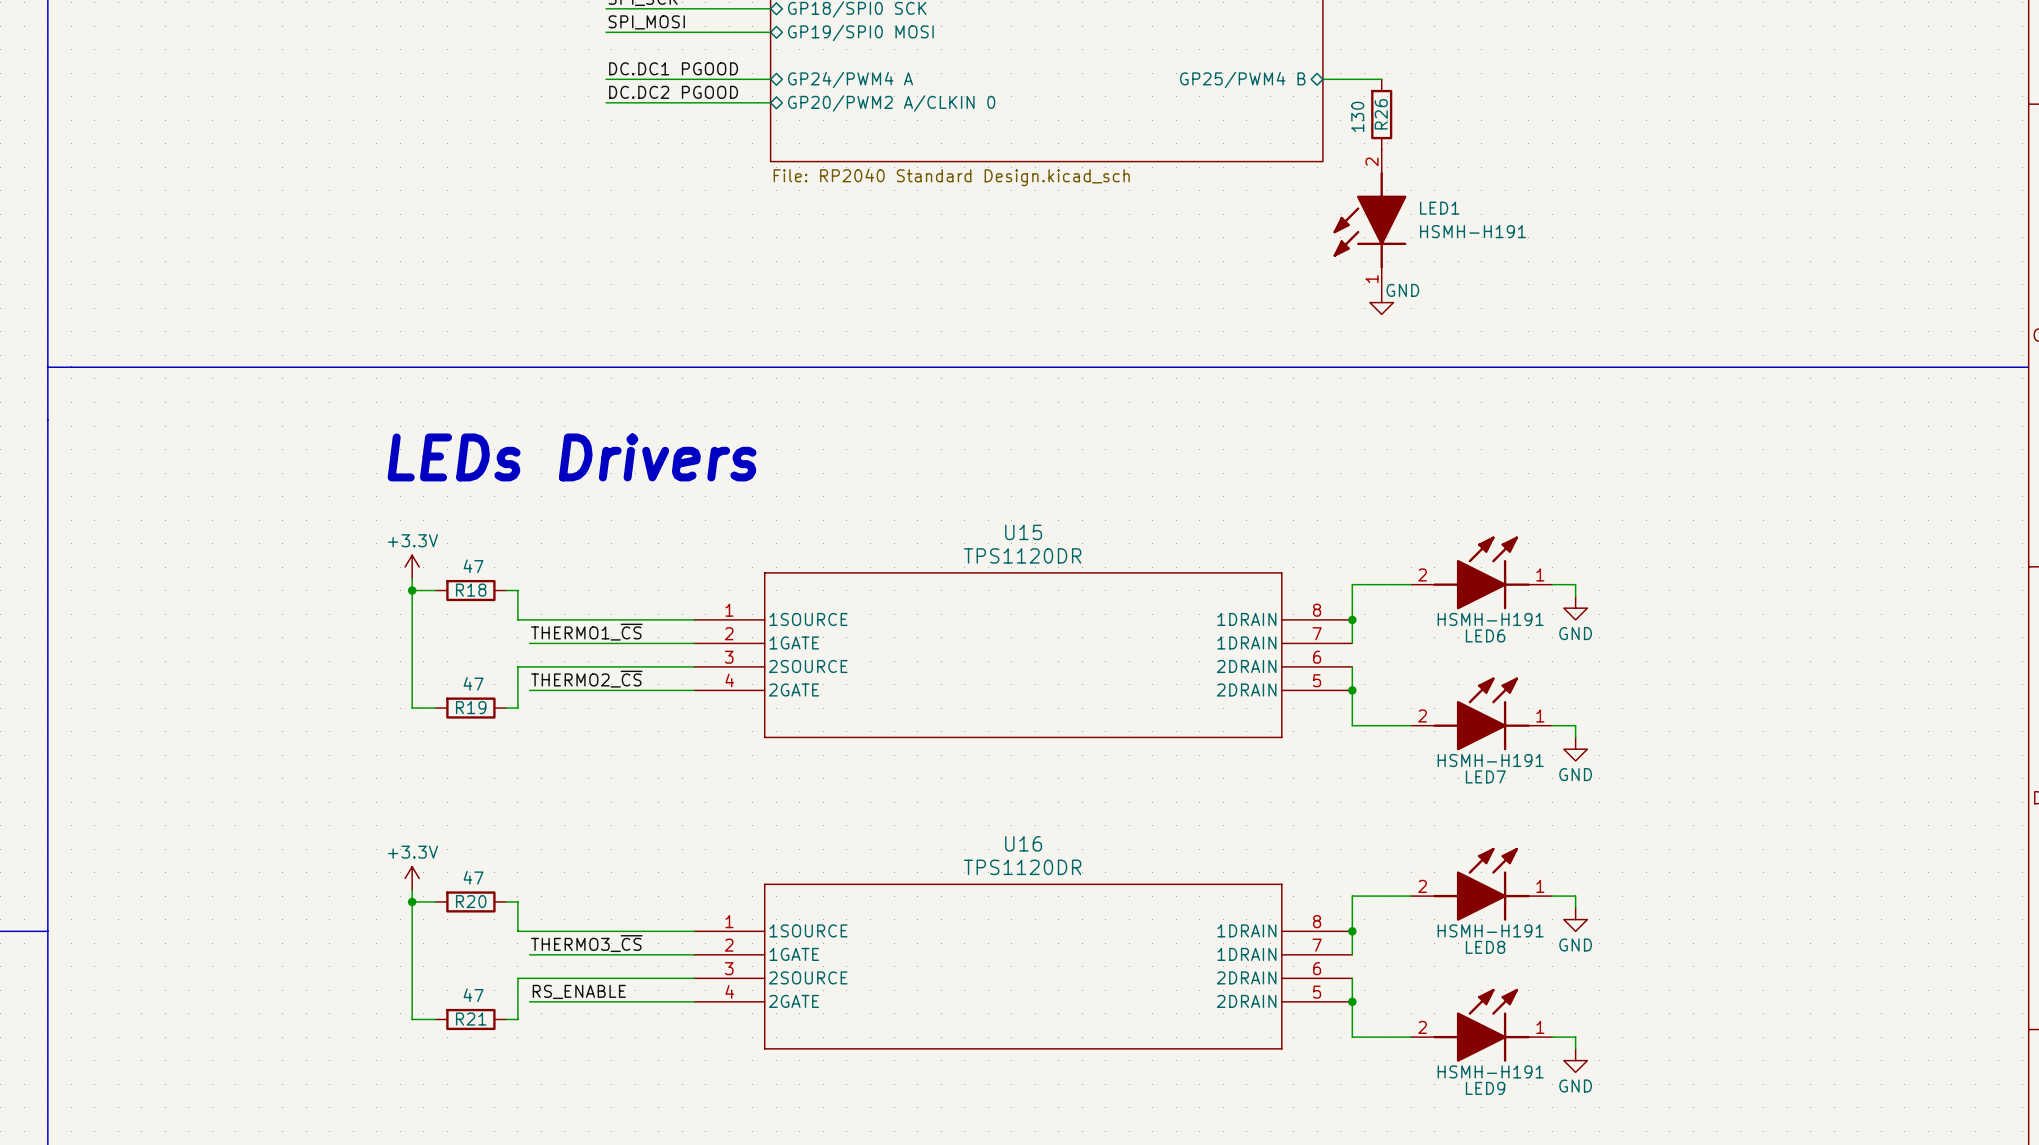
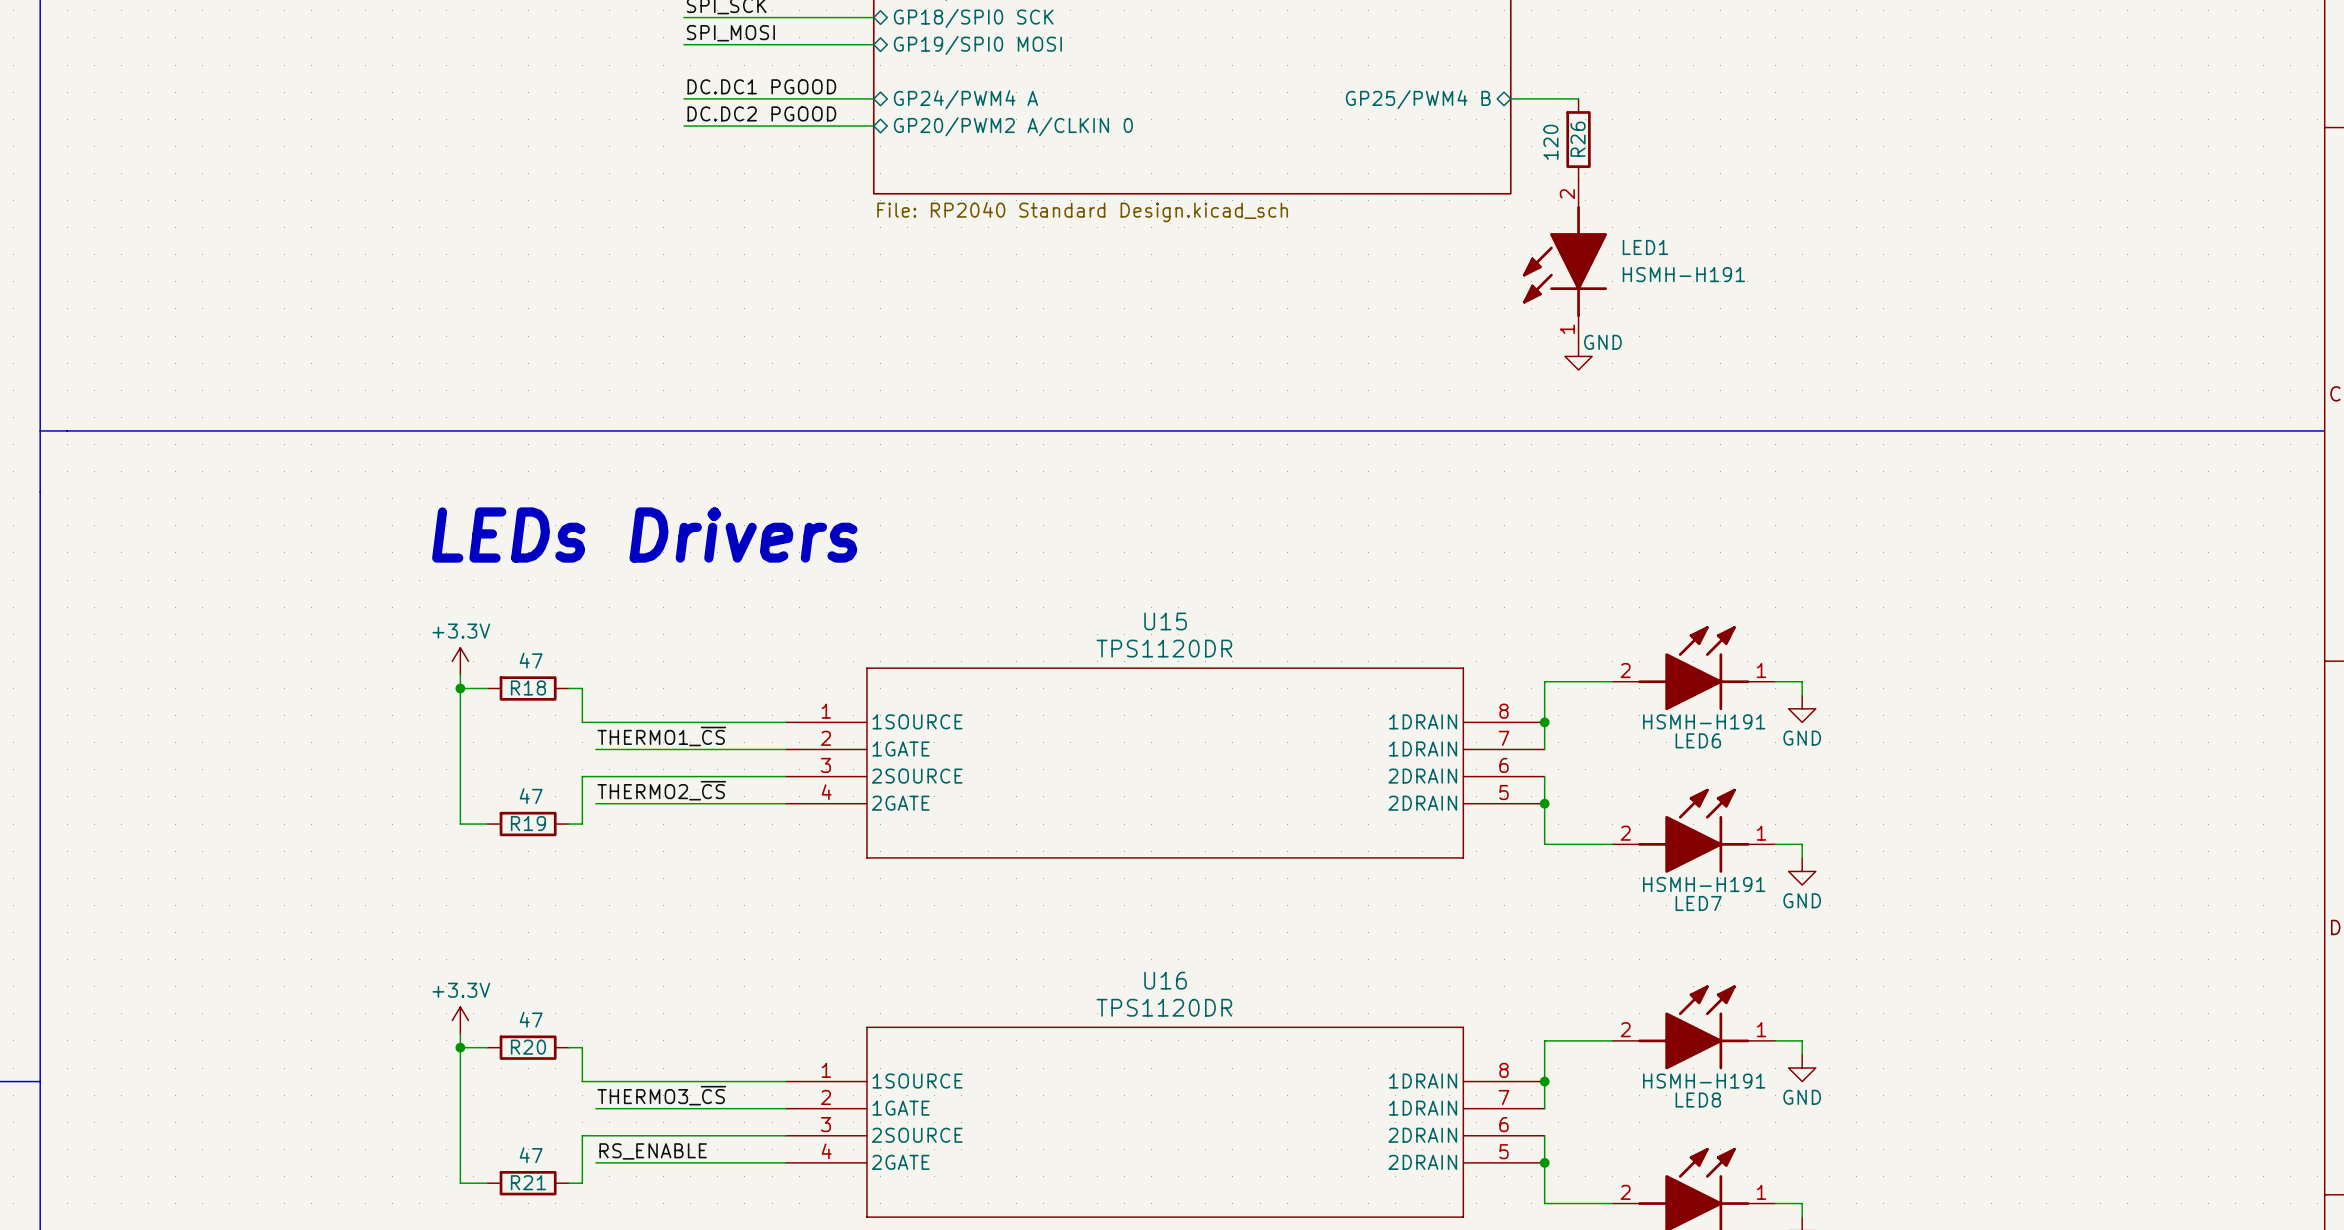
R26 value: 130 (1357, 116) -> 120 (1550, 142)

